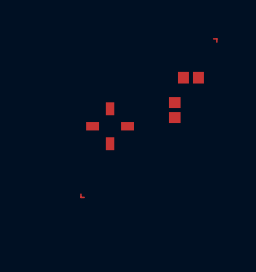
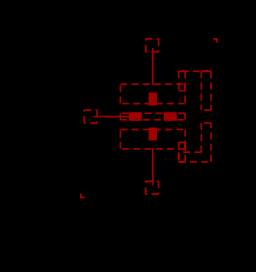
top zone outline: none -> (158, 38) (145, 38) (145, 51) (158, 51) (158, 38)
top track: none -> (152, 48) (152, 84)
top zone outline: none -> (185, 71) (185, 103) (120, 103) (120, 84) (185, 84)
top zone outline: none -> (201, 71) (201, 110) (211, 110) (211, 71) (178, 71) (178, 90) (185, 90)
part: (190, 77) -> none
top zone outline: none -> (97, 110) (84, 110) (84, 123) (97, 123) (97, 110)
part: (174, 110) -> none
top zone outline: none -> (185, 113) (120, 113) (120, 119) (185, 119) (185, 113)
top track: none -> (130, 116) (94, 116)
part position: (110, 126) -> (152, 116)
top zone outline: none -> (185, 142) (178, 142) (178, 161) (211, 161) (211, 123) (201, 123) (201, 152) (178, 152)
top track: none -> (152, 148) (152, 184)
top zone outline: none -> (185, 148) (120, 148) (120, 129) (185, 129) (185, 161)
top zone outline: none -> (158, 181) (158, 194) (145, 194) (145, 181) (158, 181)

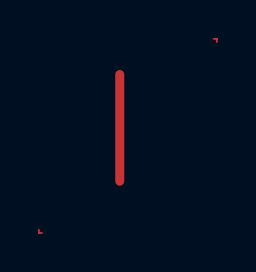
top zone outline: (158, 38) (145, 38) (145, 51) (158, 51) (158, 38) -> none
top track: (152, 48) (152, 84) -> none
top zone outline: (185, 71) (185, 103) (120, 103) (120, 84) (185, 84) -> none
top zone outline: (201, 71) (201, 110) (211, 110) (211, 71) (178, 71) (178, 90) (185, 90) -> none
top track: none -> (119, 74) (119, 181)
top zone outline: (97, 110) (84, 110) (84, 123) (97, 123) (97, 110) -> none
top zone outline: (185, 113) (120, 113) (120, 119) (185, 119) (185, 113) -> none
top track: (130, 116) (94, 116) -> none
part: (152, 116) -> none
top zone outline: (185, 142) (178, 142) (178, 161) (211, 161) (211, 123) (201, 123) (201, 152) (178, 152) -> none
top track: (152, 148) (152, 184) -> none
top zone outline: (185, 148) (120, 148) (120, 129) (185, 129) (185, 161) -> none
top zone outline: (158, 181) (158, 194) (145, 194) (145, 181) (158, 181) -> none
top track: (80, 194) (80, 197) (84, 197) -> (38, 229) (38, 233) (42, 233)

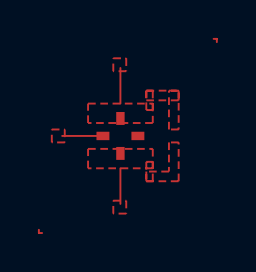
top zone outline: none -> (126, 58) (113, 58) (113, 71) (126, 71) (126, 58)
top track: none -> (120, 67) (120, 103)
top track: (119, 74) (119, 181) -> none
top zone outline: none -> (152, 90) (152, 123) (88, 123) (88, 103) (152, 103)
top zone outline: none -> (168, 90) (168, 129) (178, 129) (178, 90) (146, 90) (146, 110) (152, 110)
top zone outline: none -> (178, 100) (146, 100)
top zone outline: none -> (64, 129) (51, 129) (51, 142) (64, 142) (64, 129)
top track: none -> (97, 135) (62, 135)
part: none -> (120, 135)
top zone outline: none -> (152, 161) (146, 161) (146, 181) (178, 181) (178, 142) (168, 142) (168, 171) (146, 171)
top track: none -> (120, 168) (120, 203)
top zone outline: none -> (152, 168) (88, 168) (88, 148) (152, 148) (152, 181)
top zone outline: none -> (126, 200) (126, 213) (113, 213) (113, 200) (126, 200)

